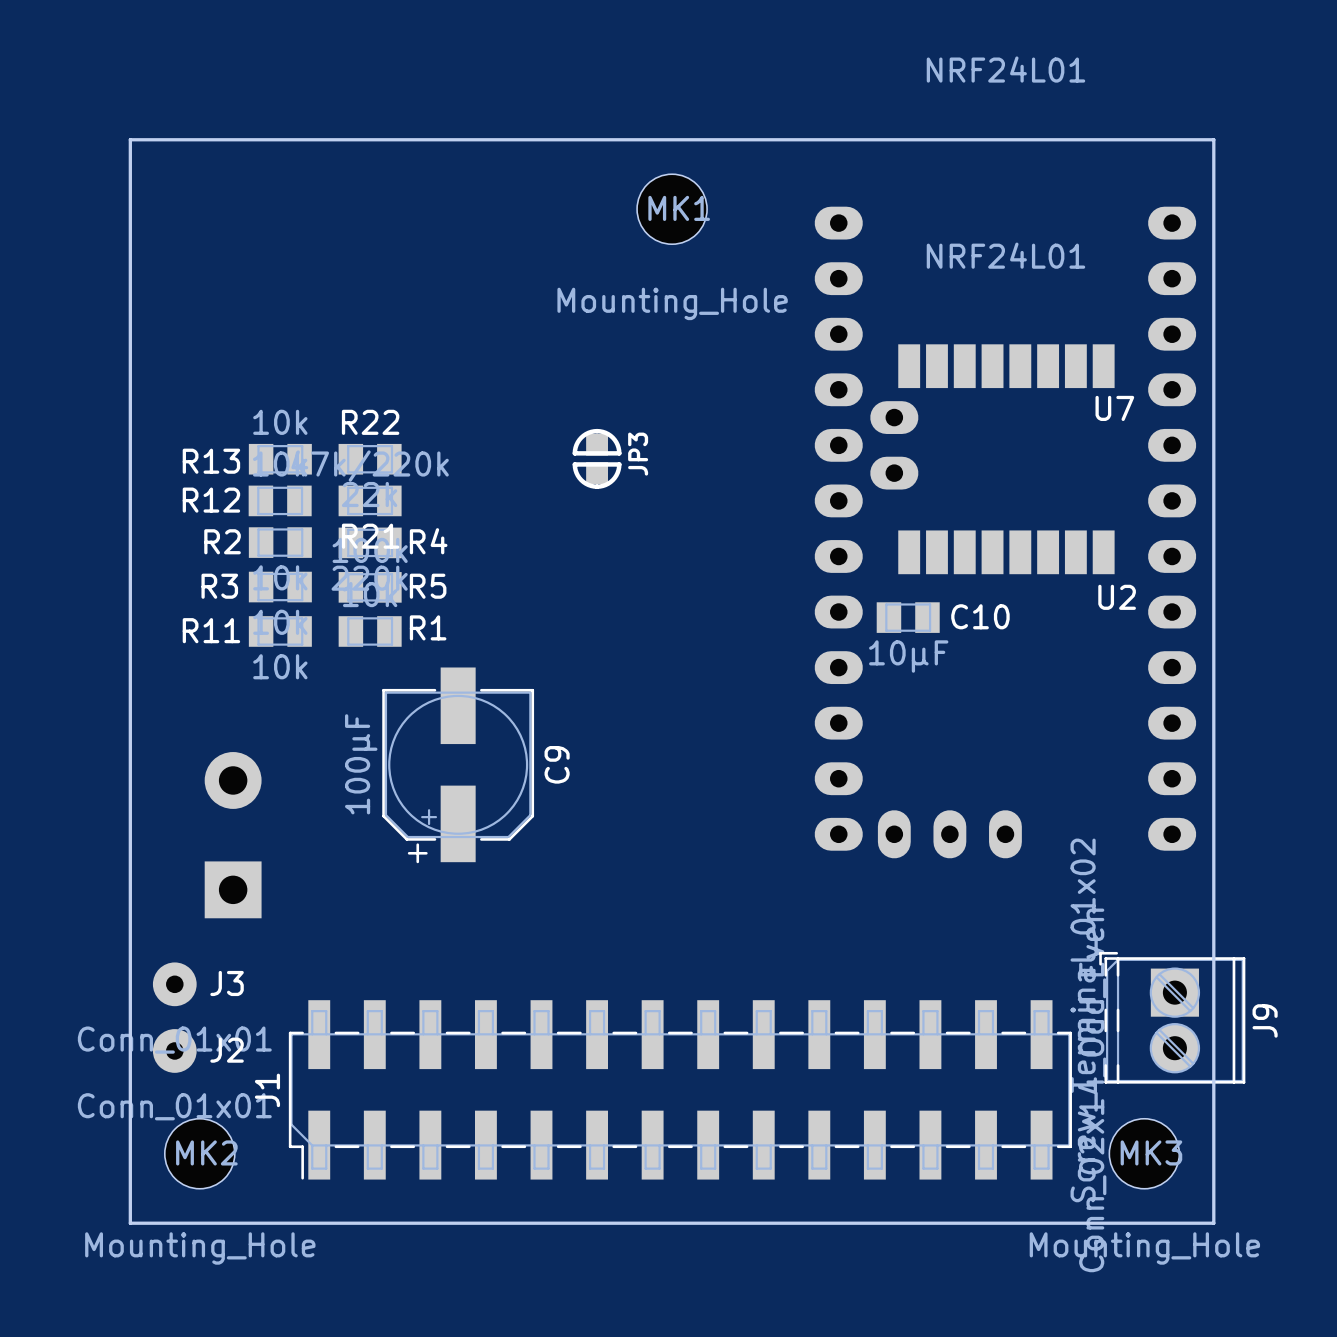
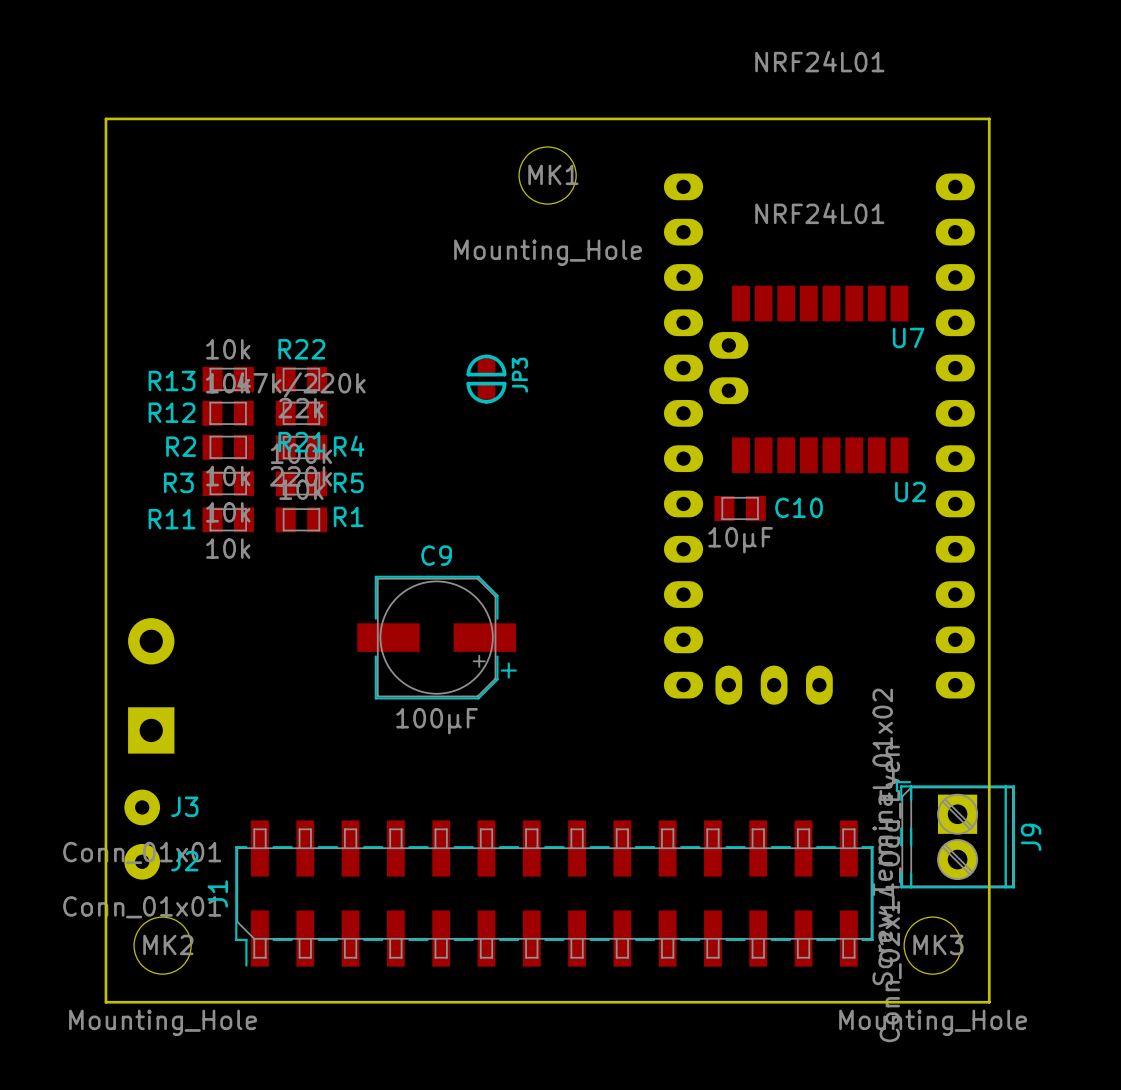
C9 footprint: [382, 667, 535, 864] -> [357, 575, 517, 700]
C9 value position: 100µF (361, 764) -> 100µF (437, 721)
C9 name position: C9 (557, 764) -> C9 (436, 555)
part position: (233, 835) -> (151, 685)

